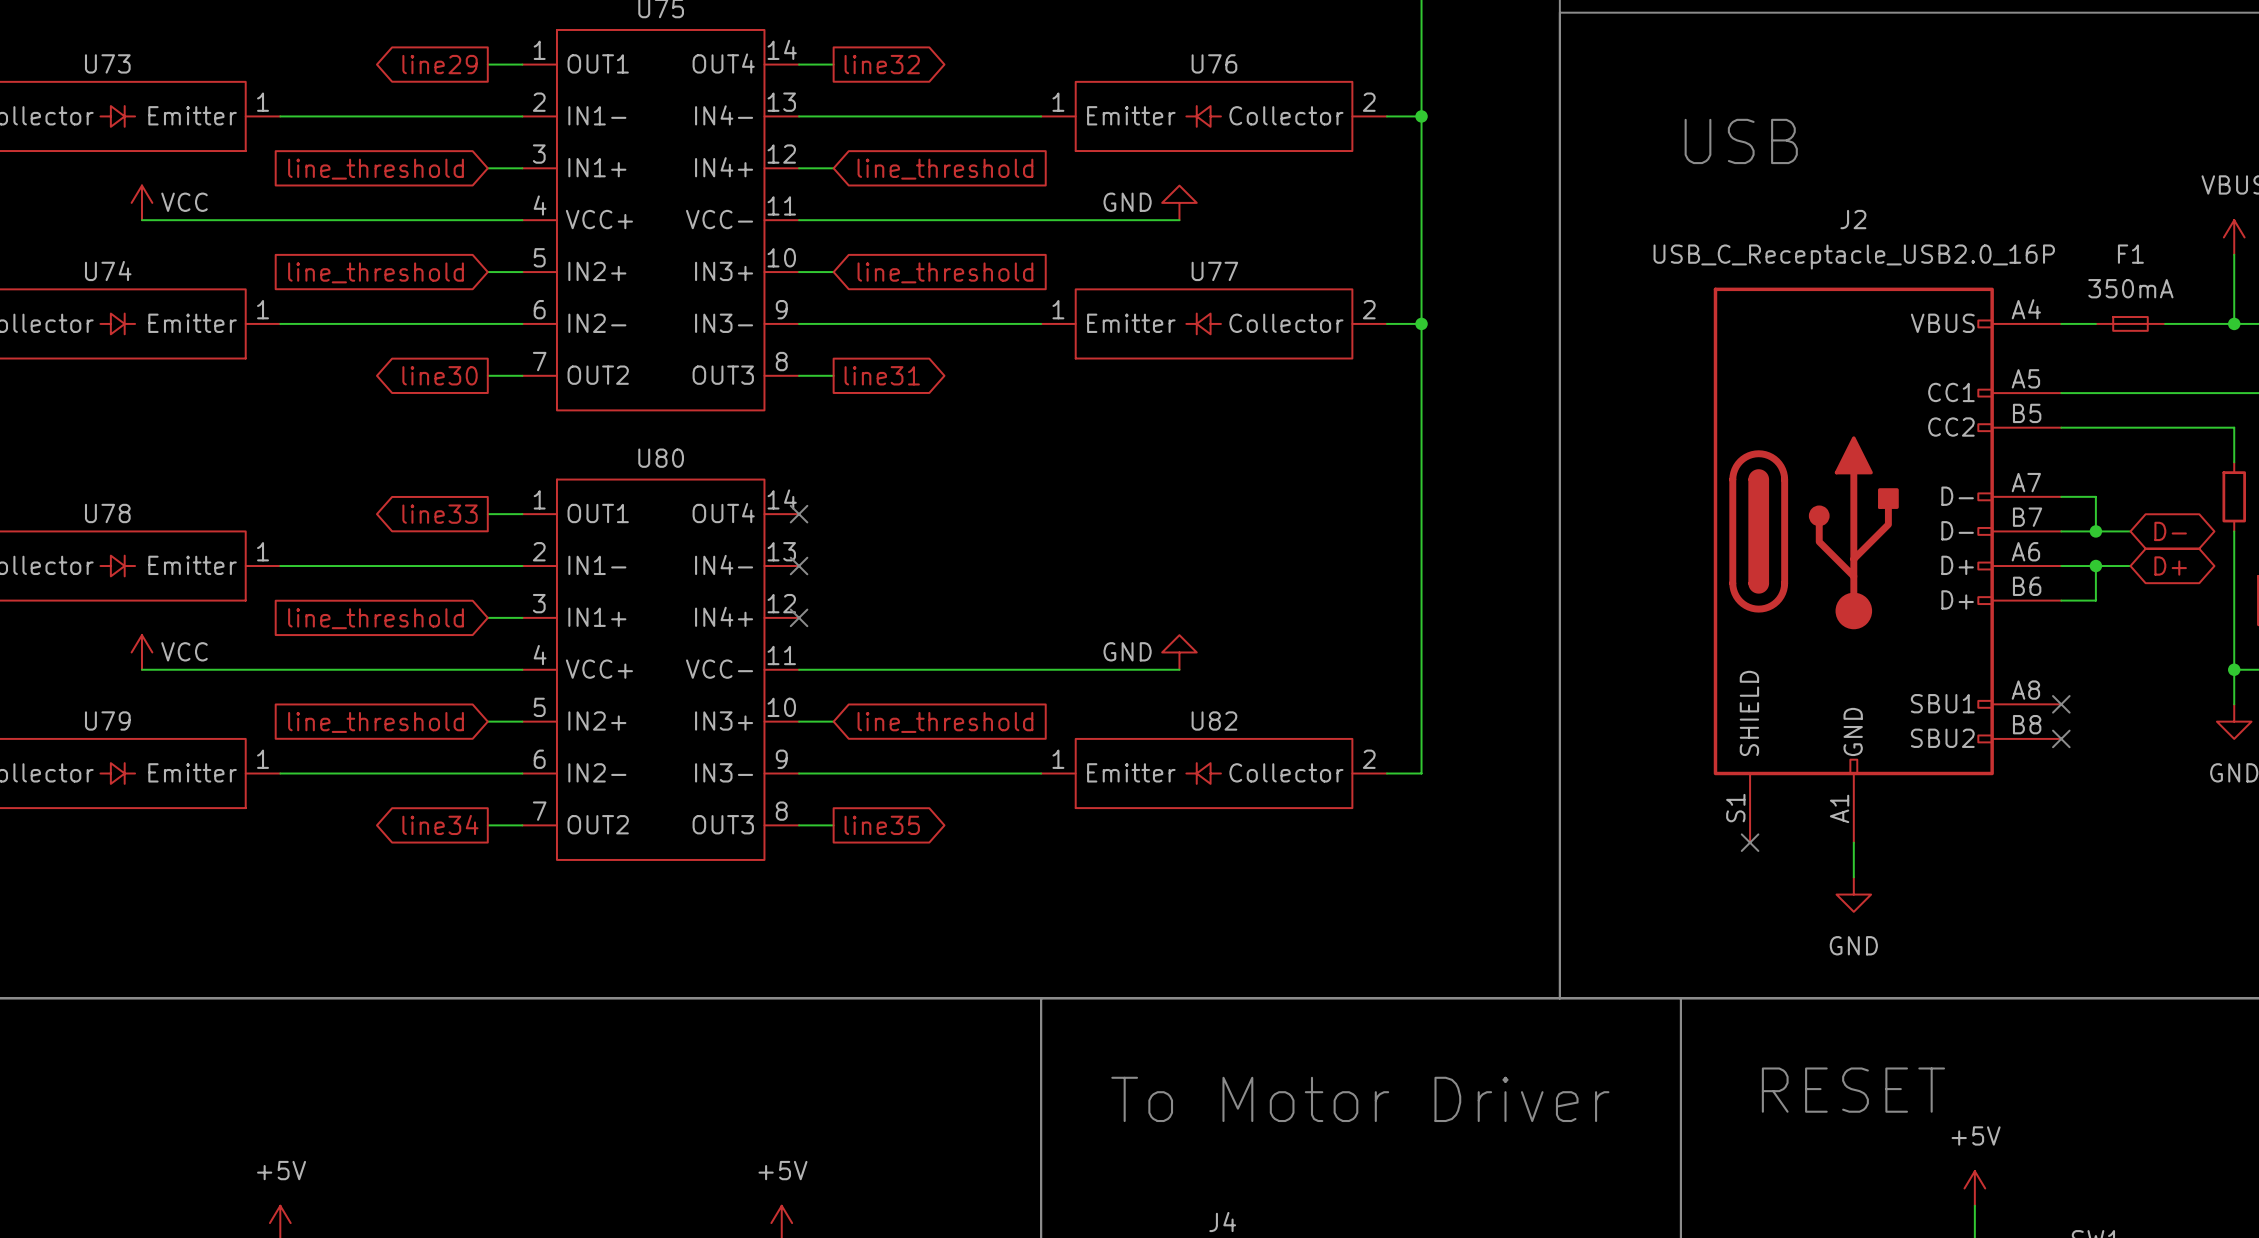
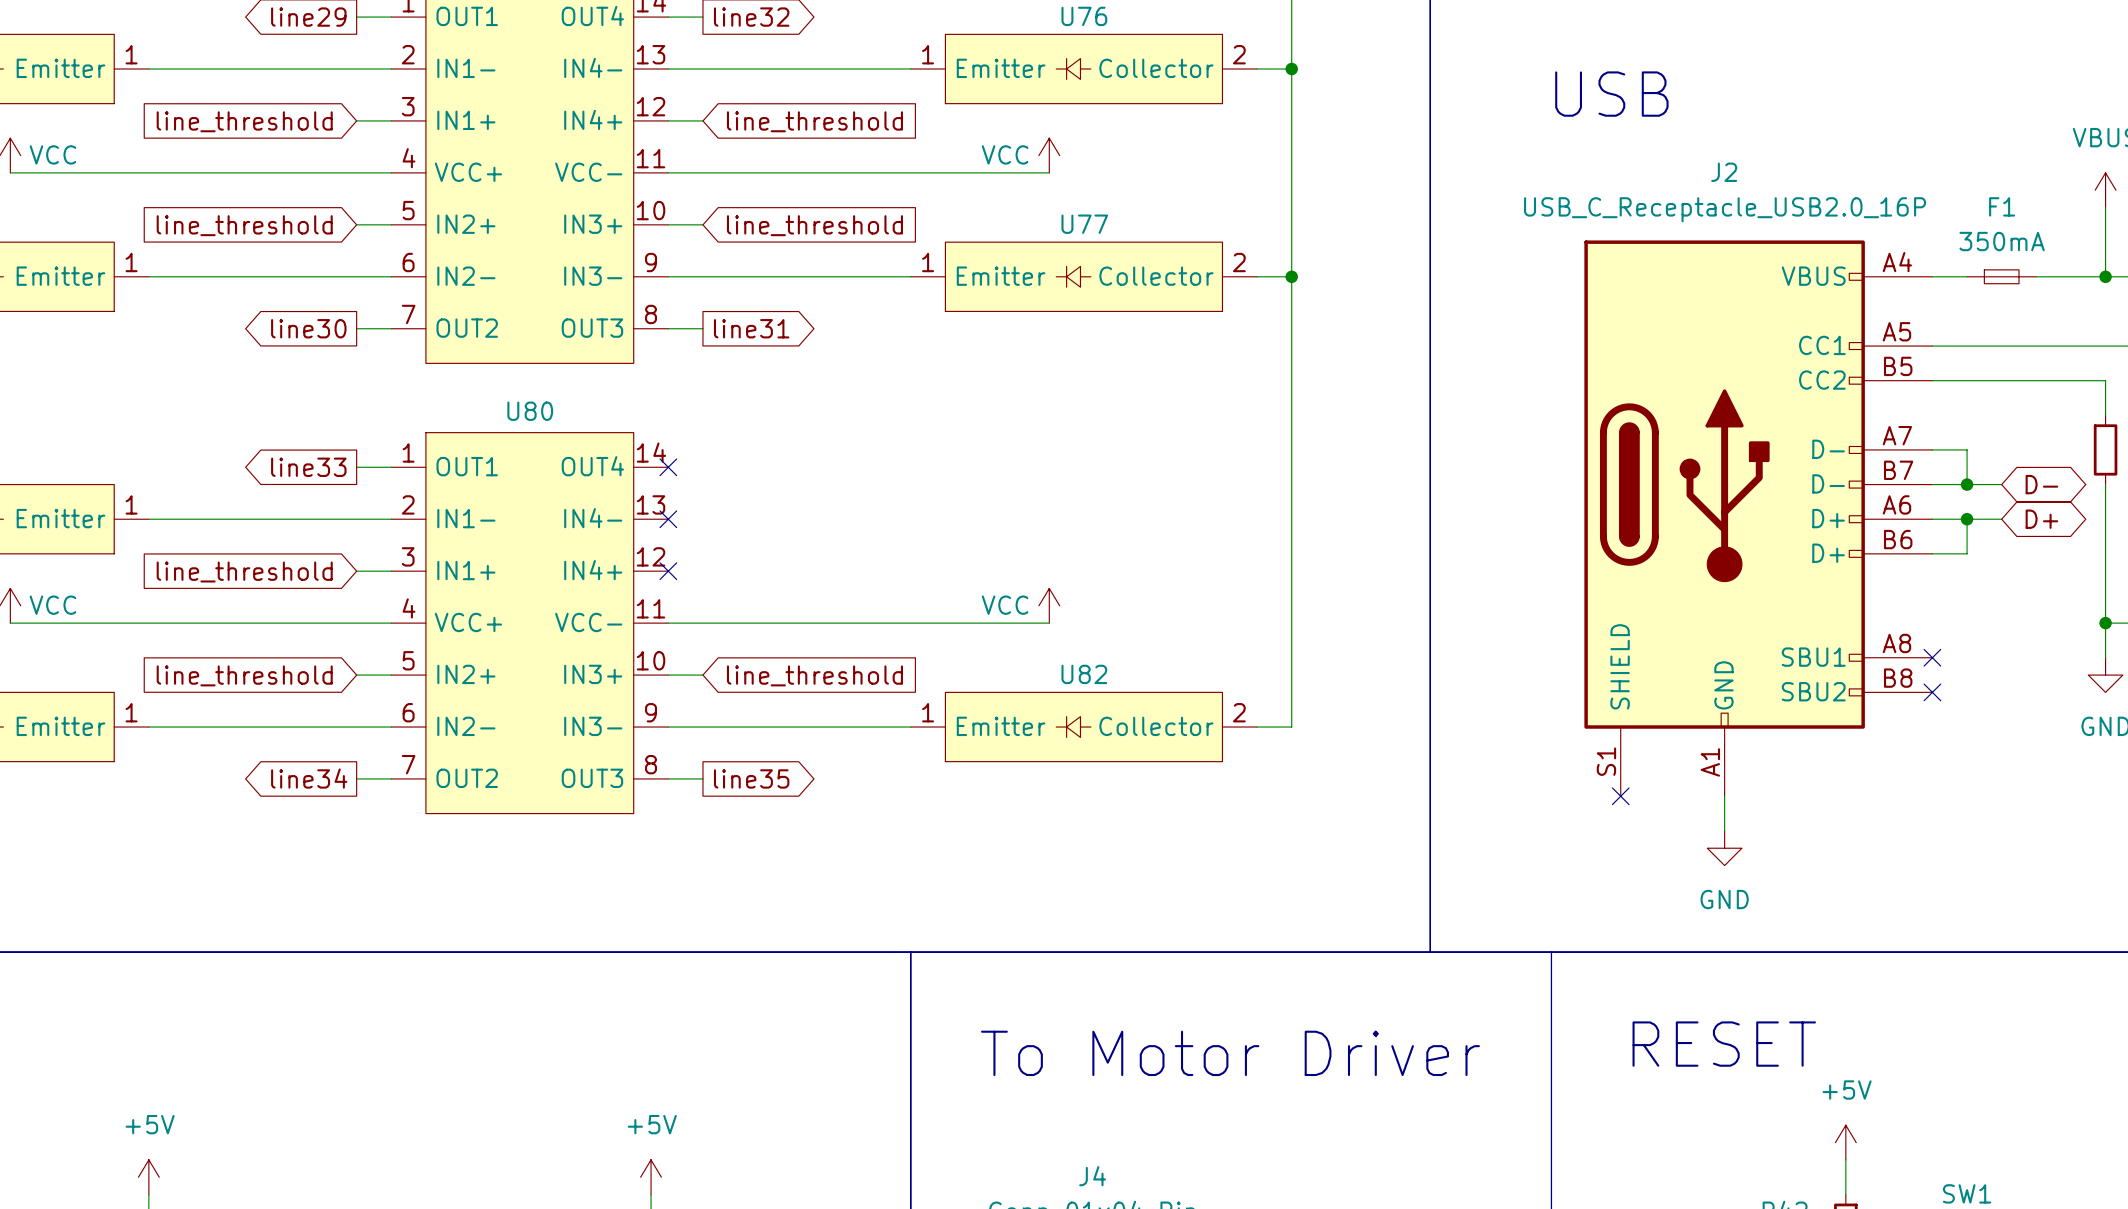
power symbol: GND (1179, 202) -> VCC (1049, 155)
power symbol: GND (1179, 652) -> VCC (1049, 605)

